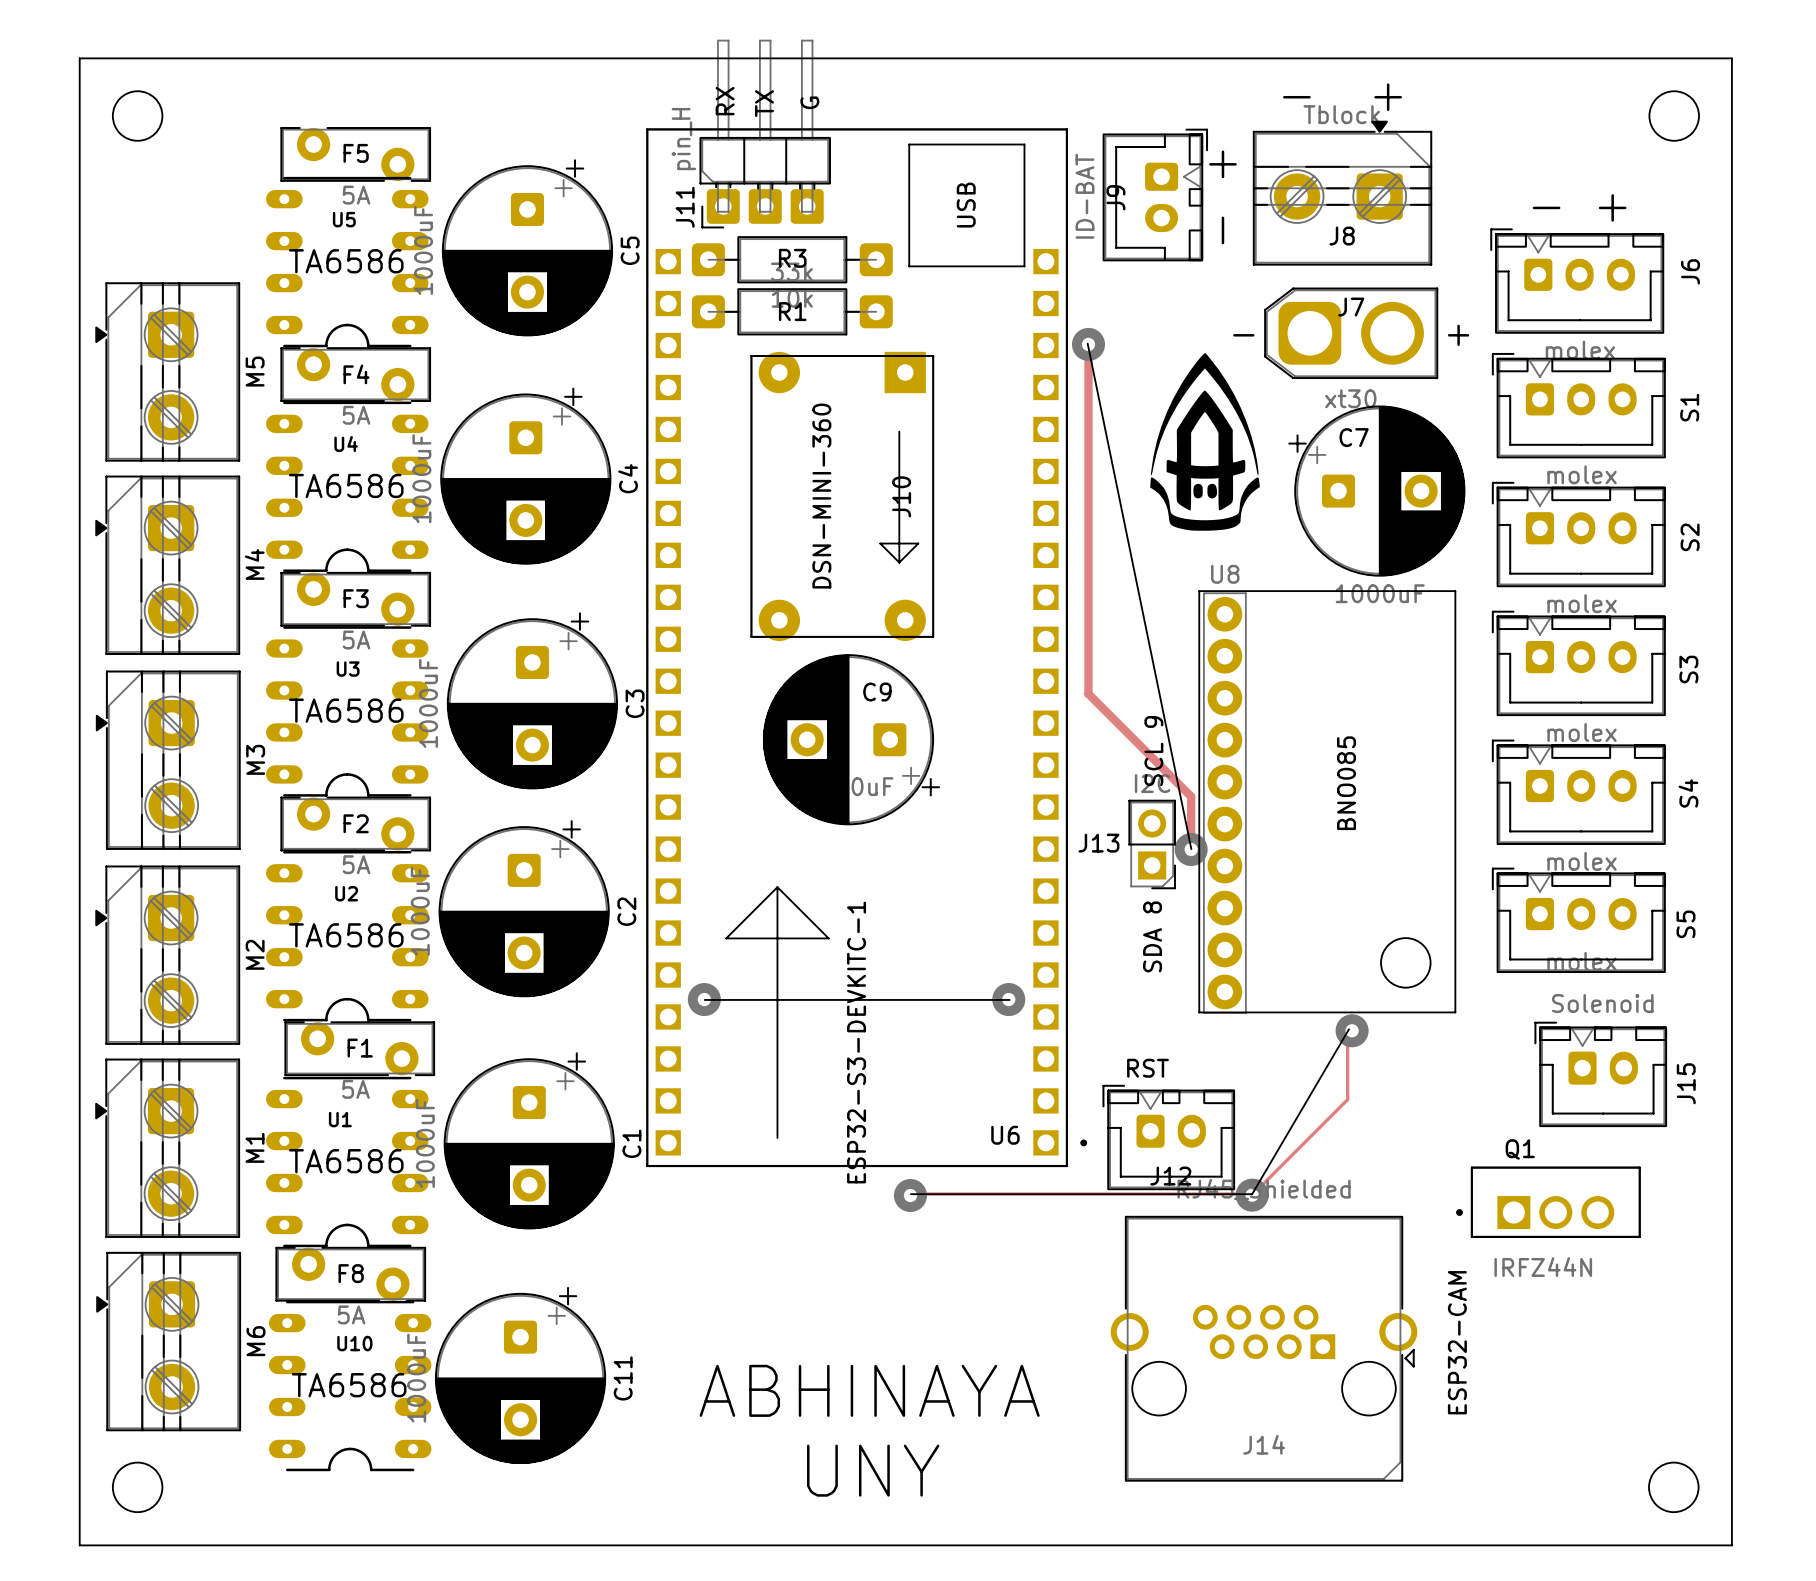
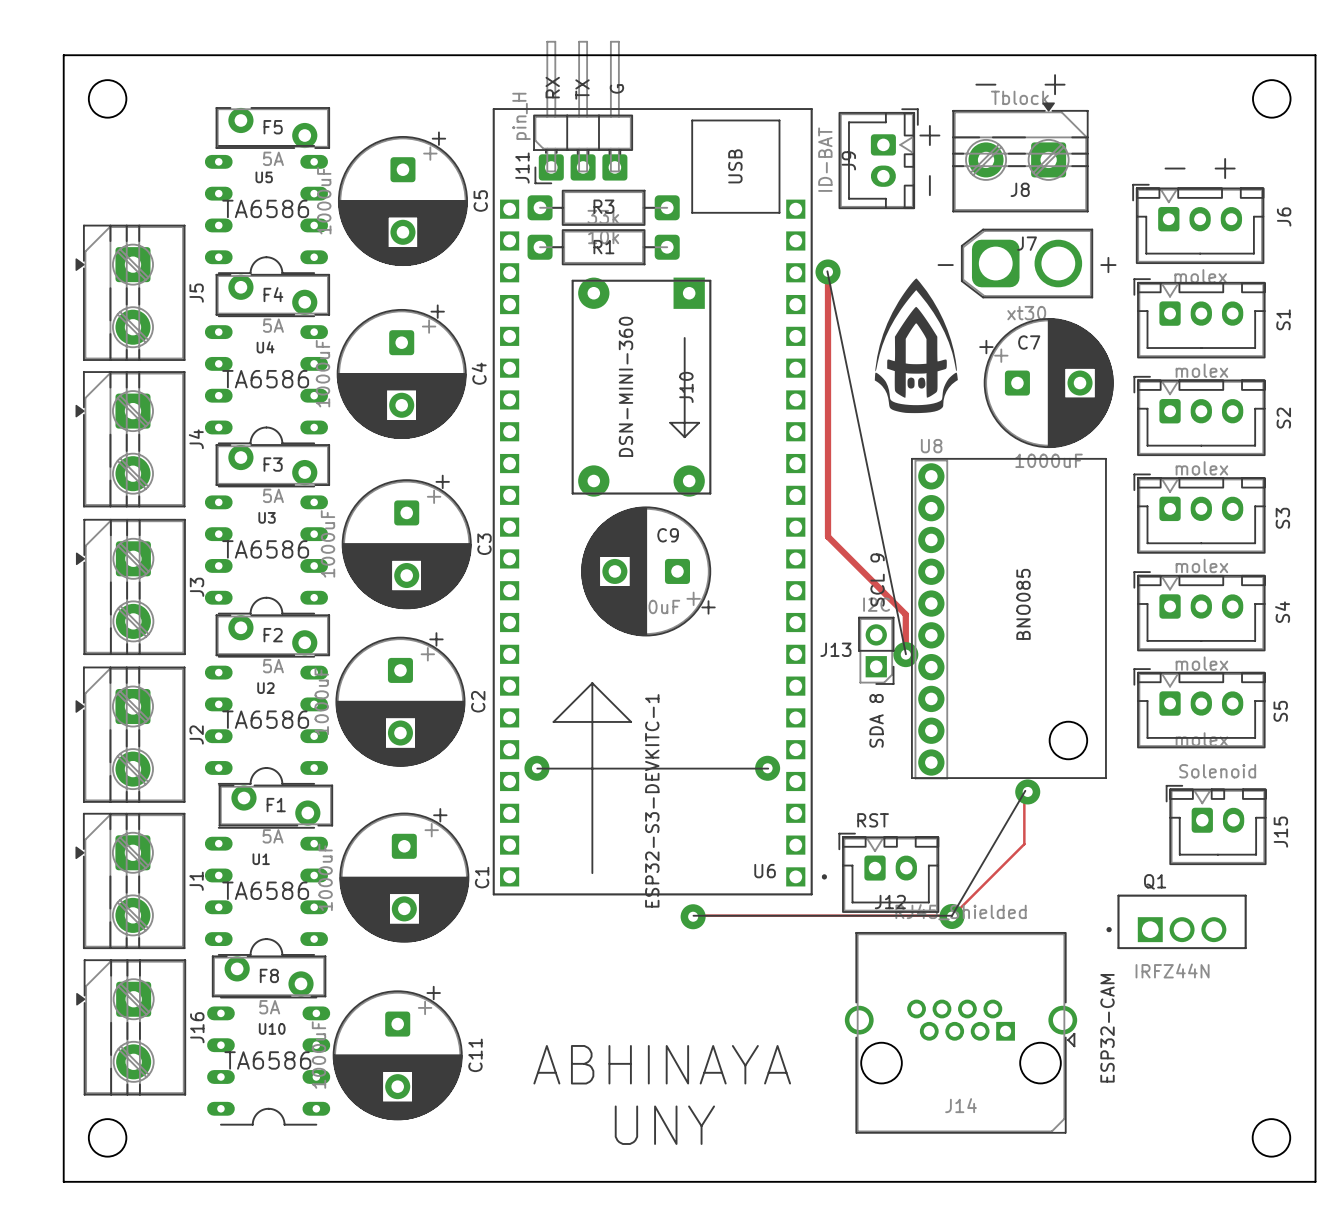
M5 name: M5 (255, 371) -> J5 (196, 293)
M4 name: M4 (254, 564) -> J4 (196, 439)
M3 name: M3 (255, 759) -> J3 (197, 587)
M2 name: M2 (255, 954) -> J2 (196, 734)
M1 name: M1 (255, 1147) -> J1 (196, 881)
M6 name: M6 (256, 1341) -> J16 (197, 1027)

